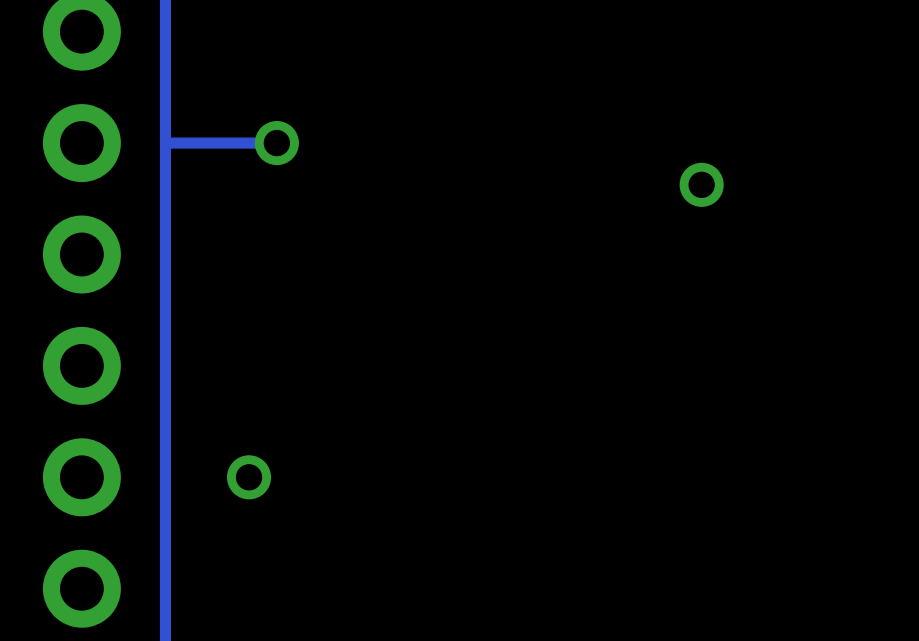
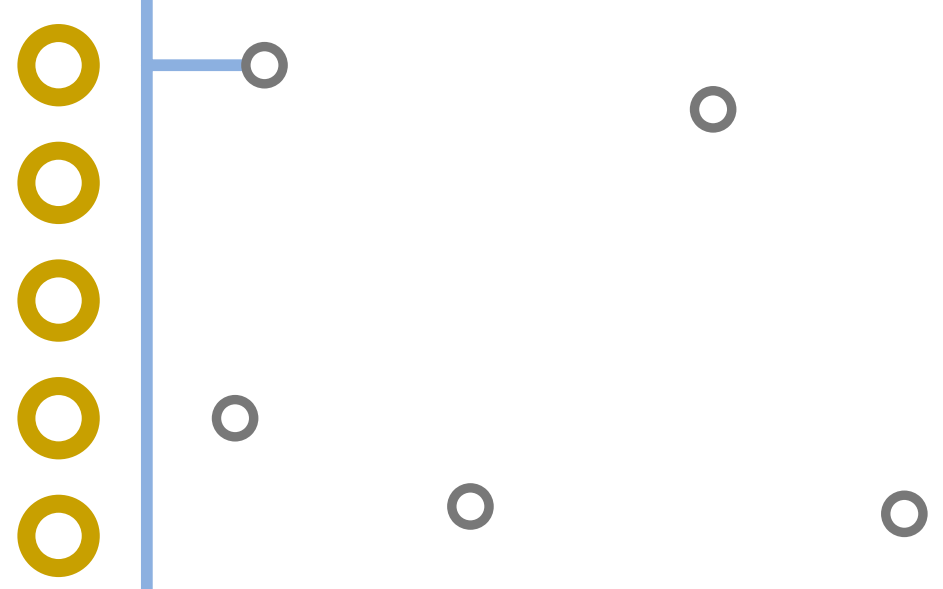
via: none -> (470, 506)
via: none -> (904, 513)

